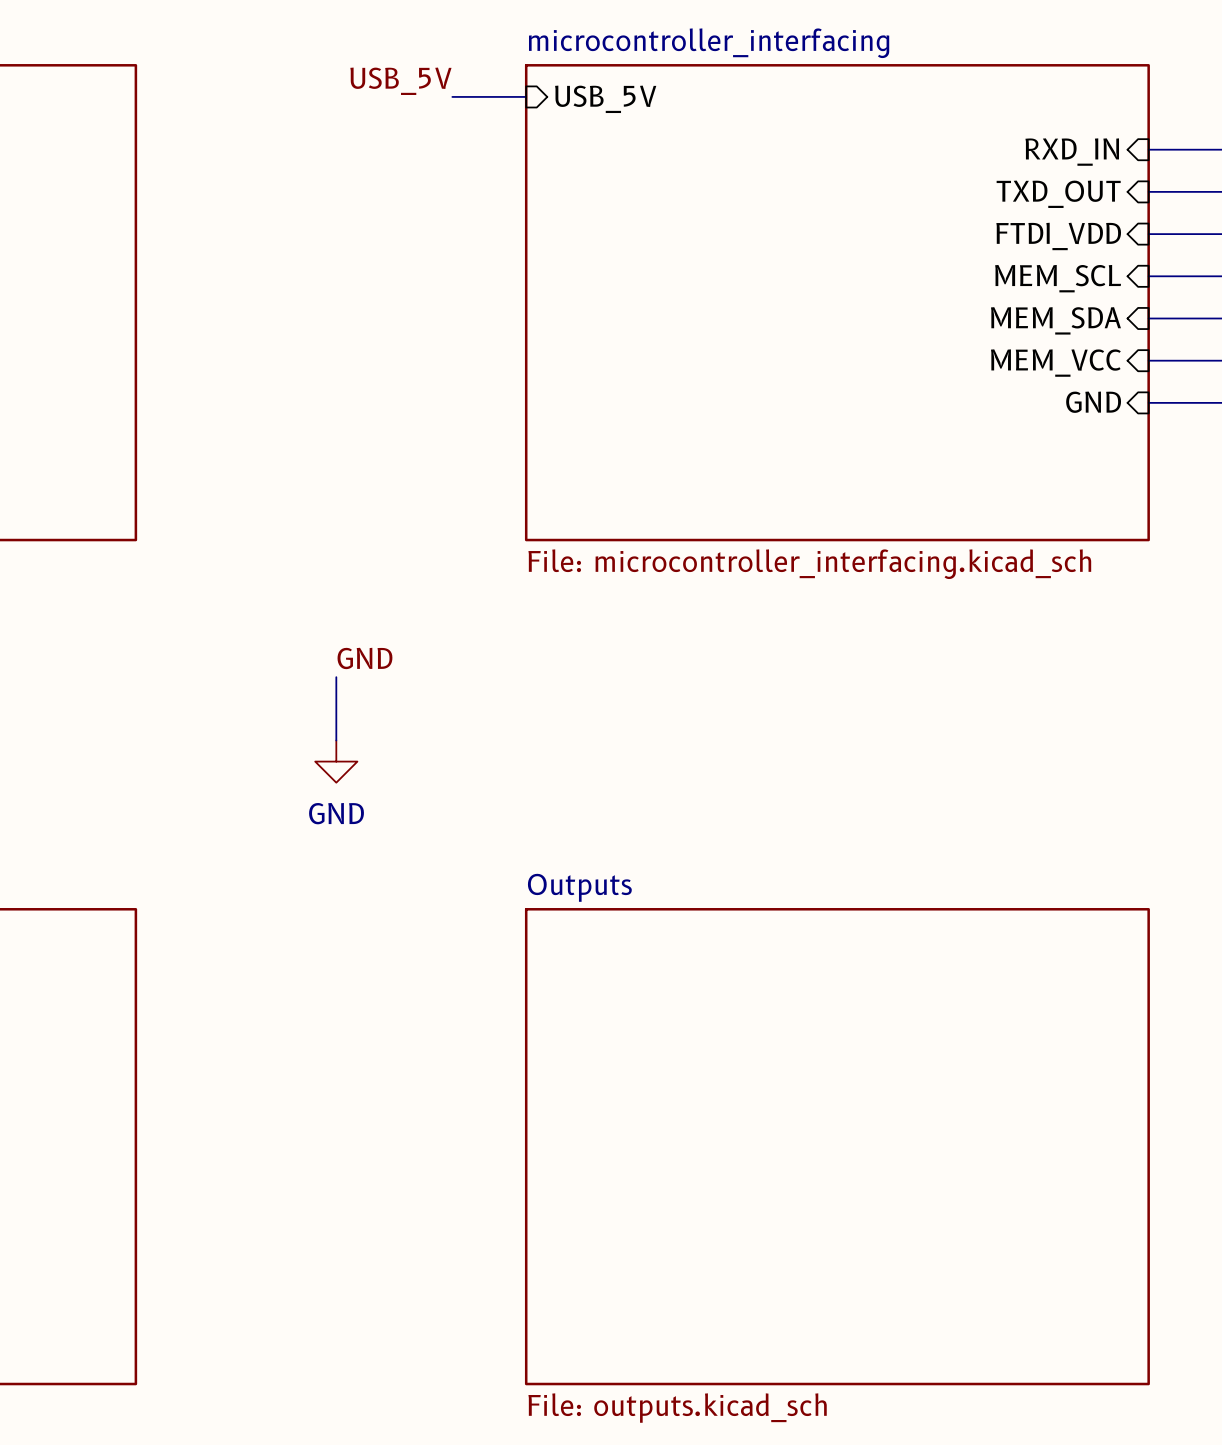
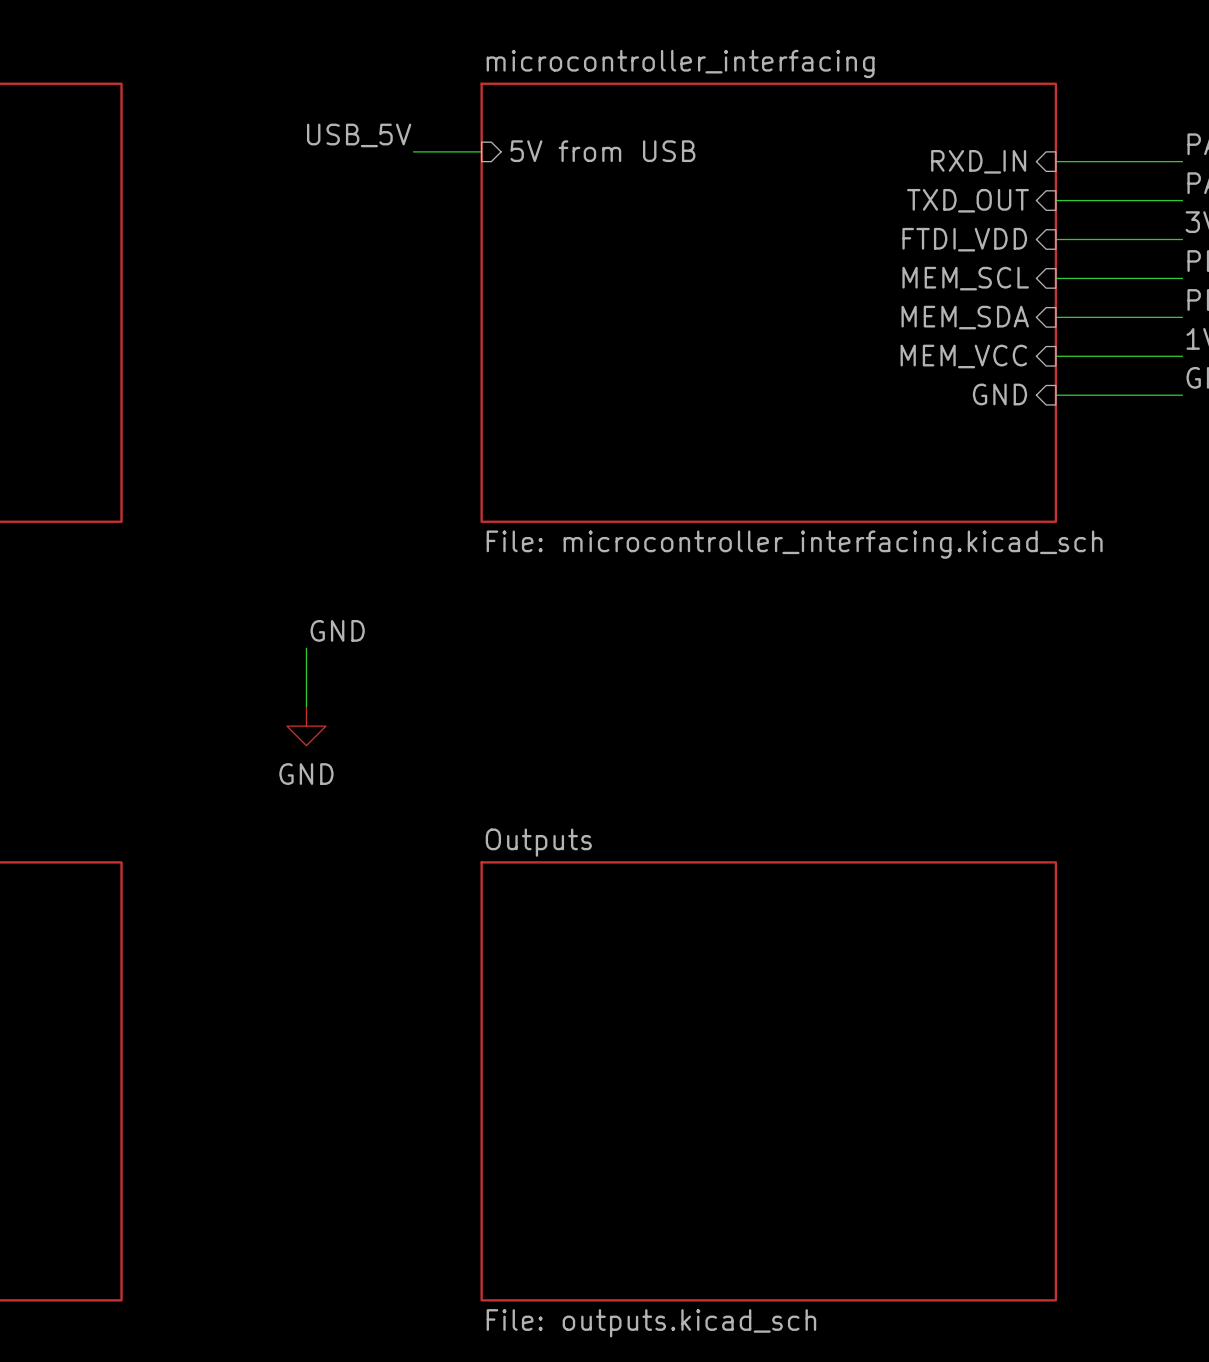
label position: USB_5V (400, 81) -> USB_5V (359, 135)
wire: (452, 96) (526, 96) -> (413, 151) (481, 151)
sheet pin: USB_5V (605, 99) -> none
sheet pin: none -> 5V from USB (602, 151)

